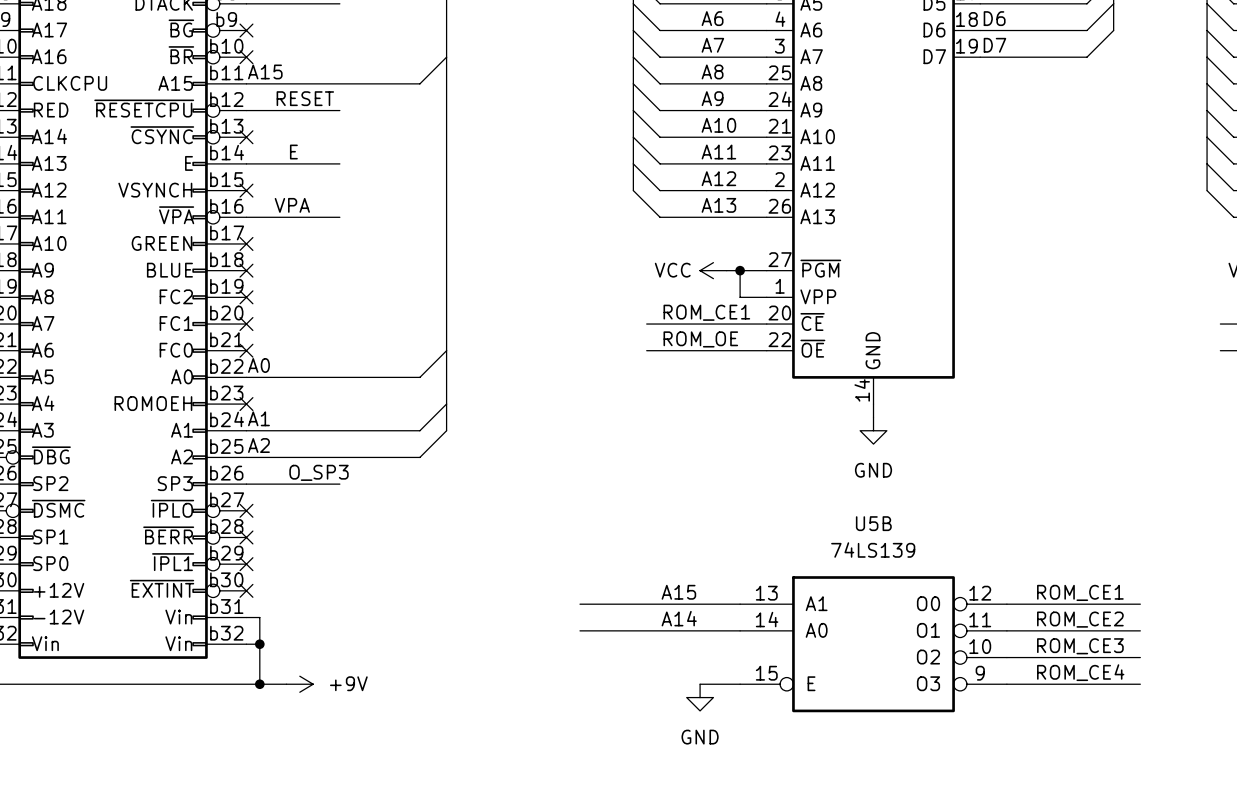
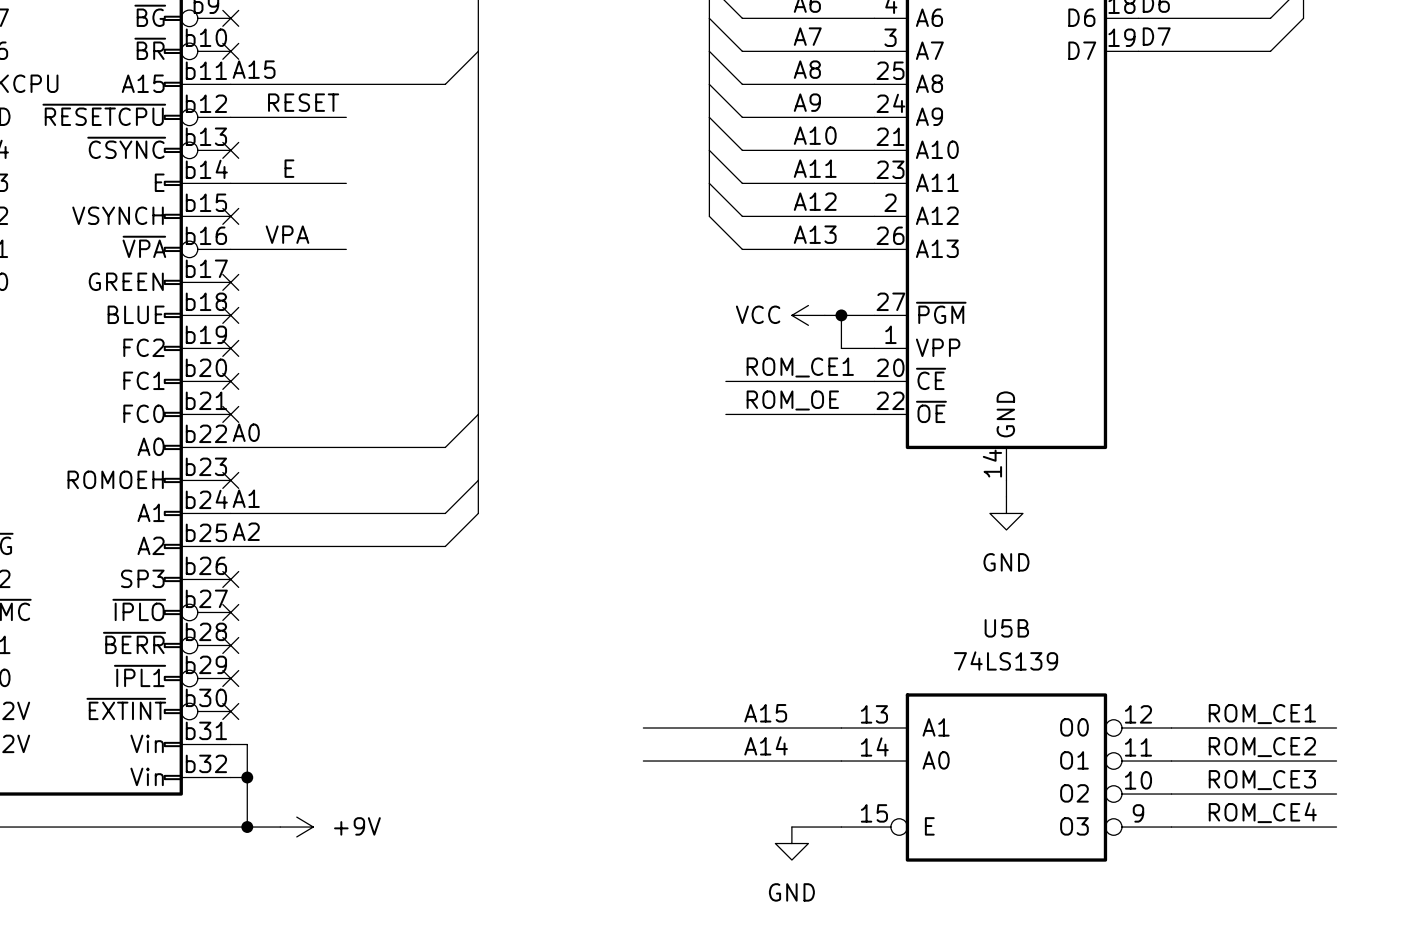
label: O_SP3 (318, 472) -> none
wire: (246, 484) (339, 484) -> none
no-connect mark: none -> (230, 579)

